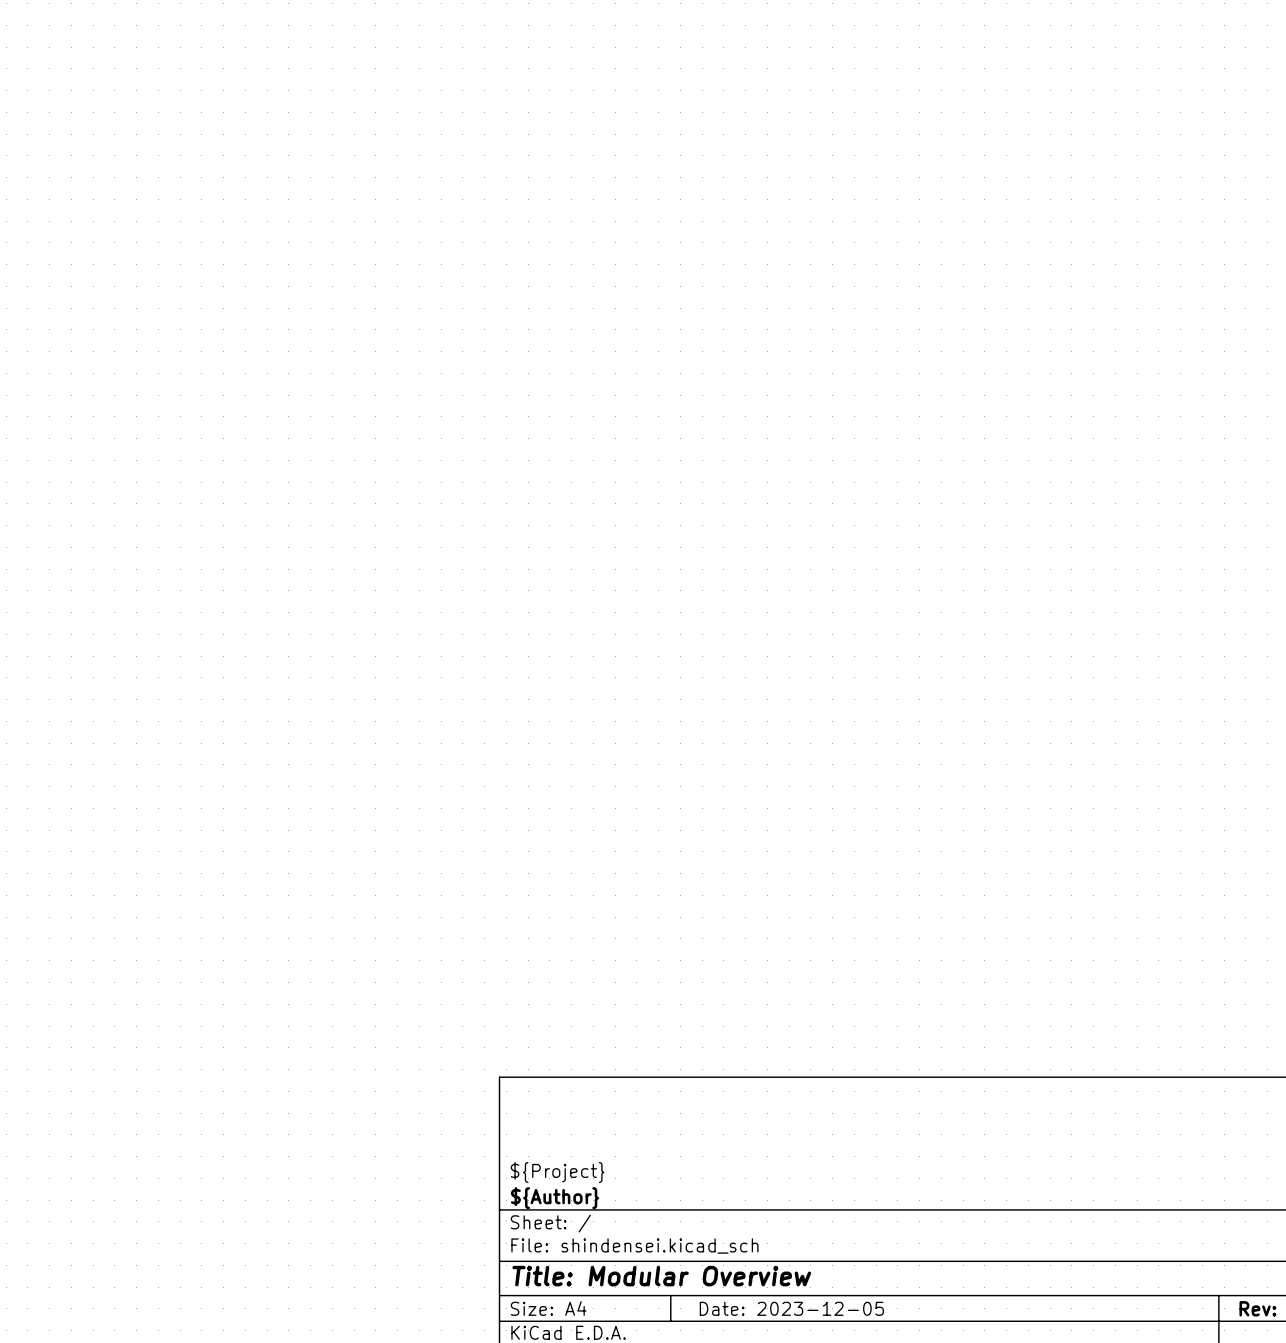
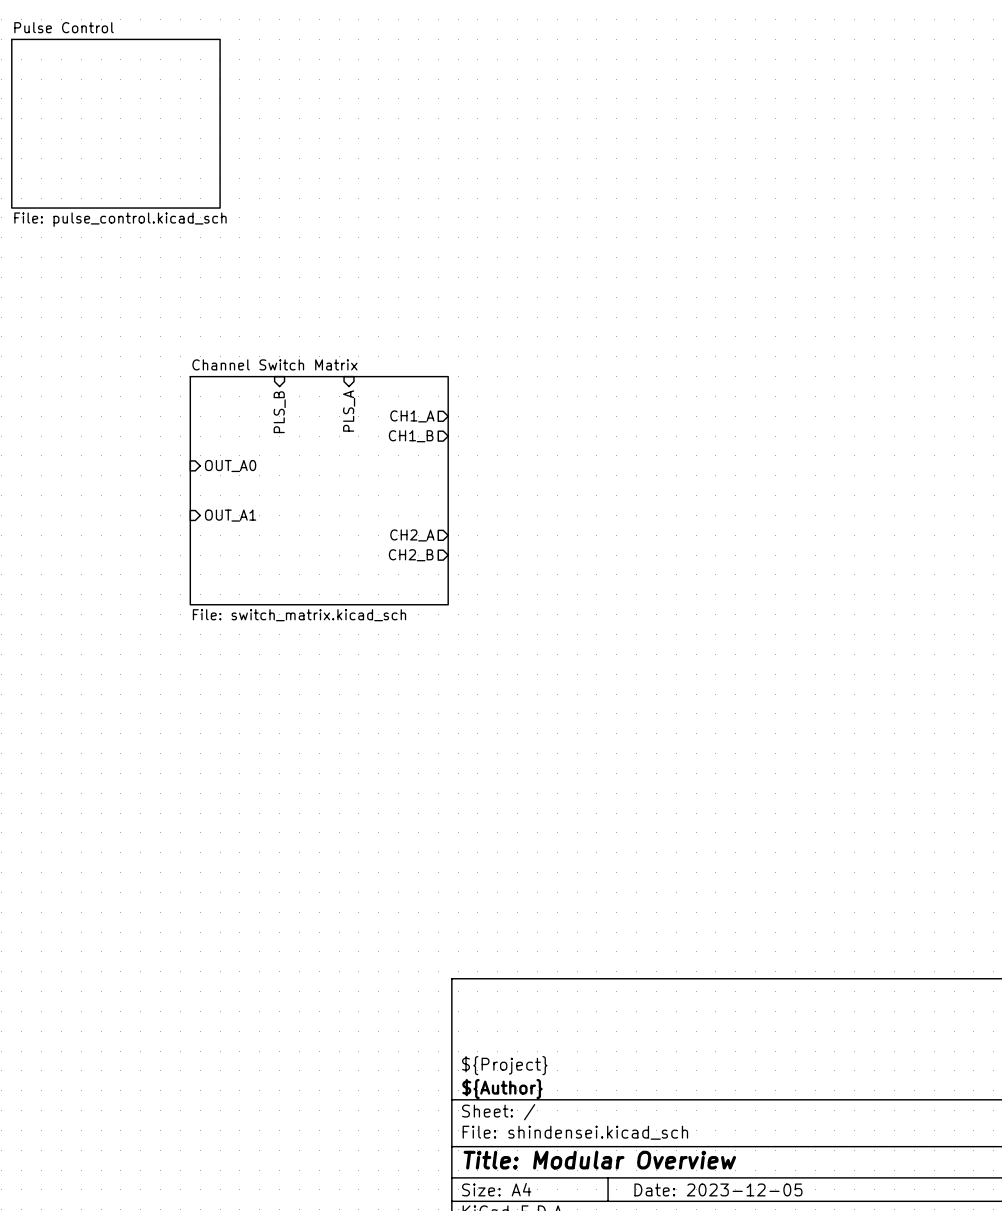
sheet Pulse Control: none -> File: pulse_control.kicad_sch (115, 123)
sheet pin: none -> PLS_A (349, 411)
sheet pin: none -> PLS_B (279, 412)
sheet pin: none -> CH1_A (412, 416)
sheet pin: none -> CH1_B (411, 436)
sheet pin: none -> OUT_A0 (230, 465)
sheet Channel Switch Matrix: none -> File: switch_matrix.kicad_sch (319, 490)
sheet pin: none -> OUT_A1 (230, 515)
sheet pin: none -> CH2_A (412, 535)
sheet pin: none -> CH2_B (411, 555)

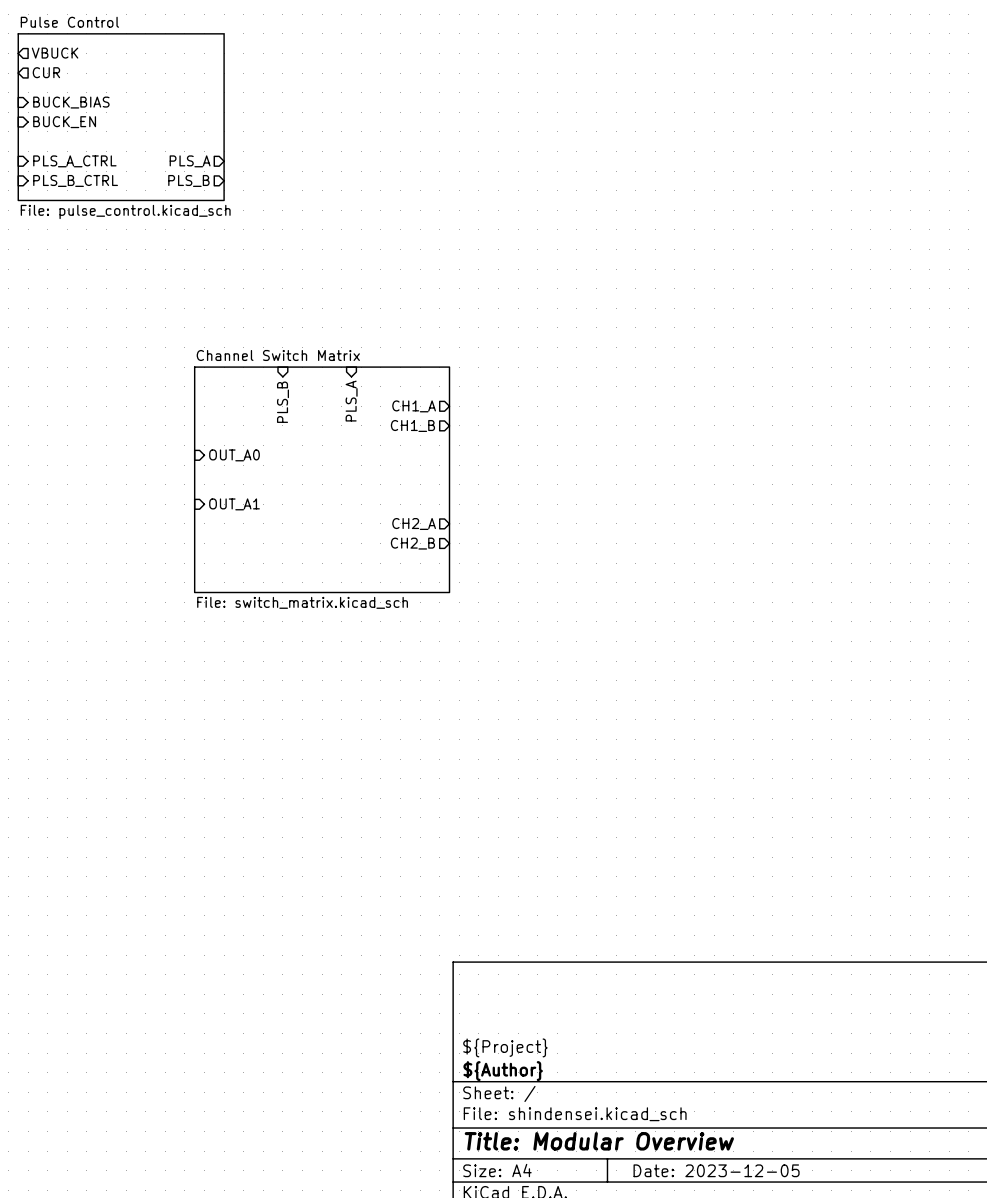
sheet pin: none -> VBUCK (55, 53)
sheet pin: none -> CUR (46, 72)
sheet pin: none -> BUCK_BIAS (71, 102)
sheet pin: none -> BUCK_EN (64, 122)
sheet pin: none -> PLS_A_CTRL (74, 161)
sheet pin: none -> PLS_A (190, 161)
sheet pin: none -> PLS_B_CTRL (75, 180)
sheet pin: none -> PLS_B (188, 180)

